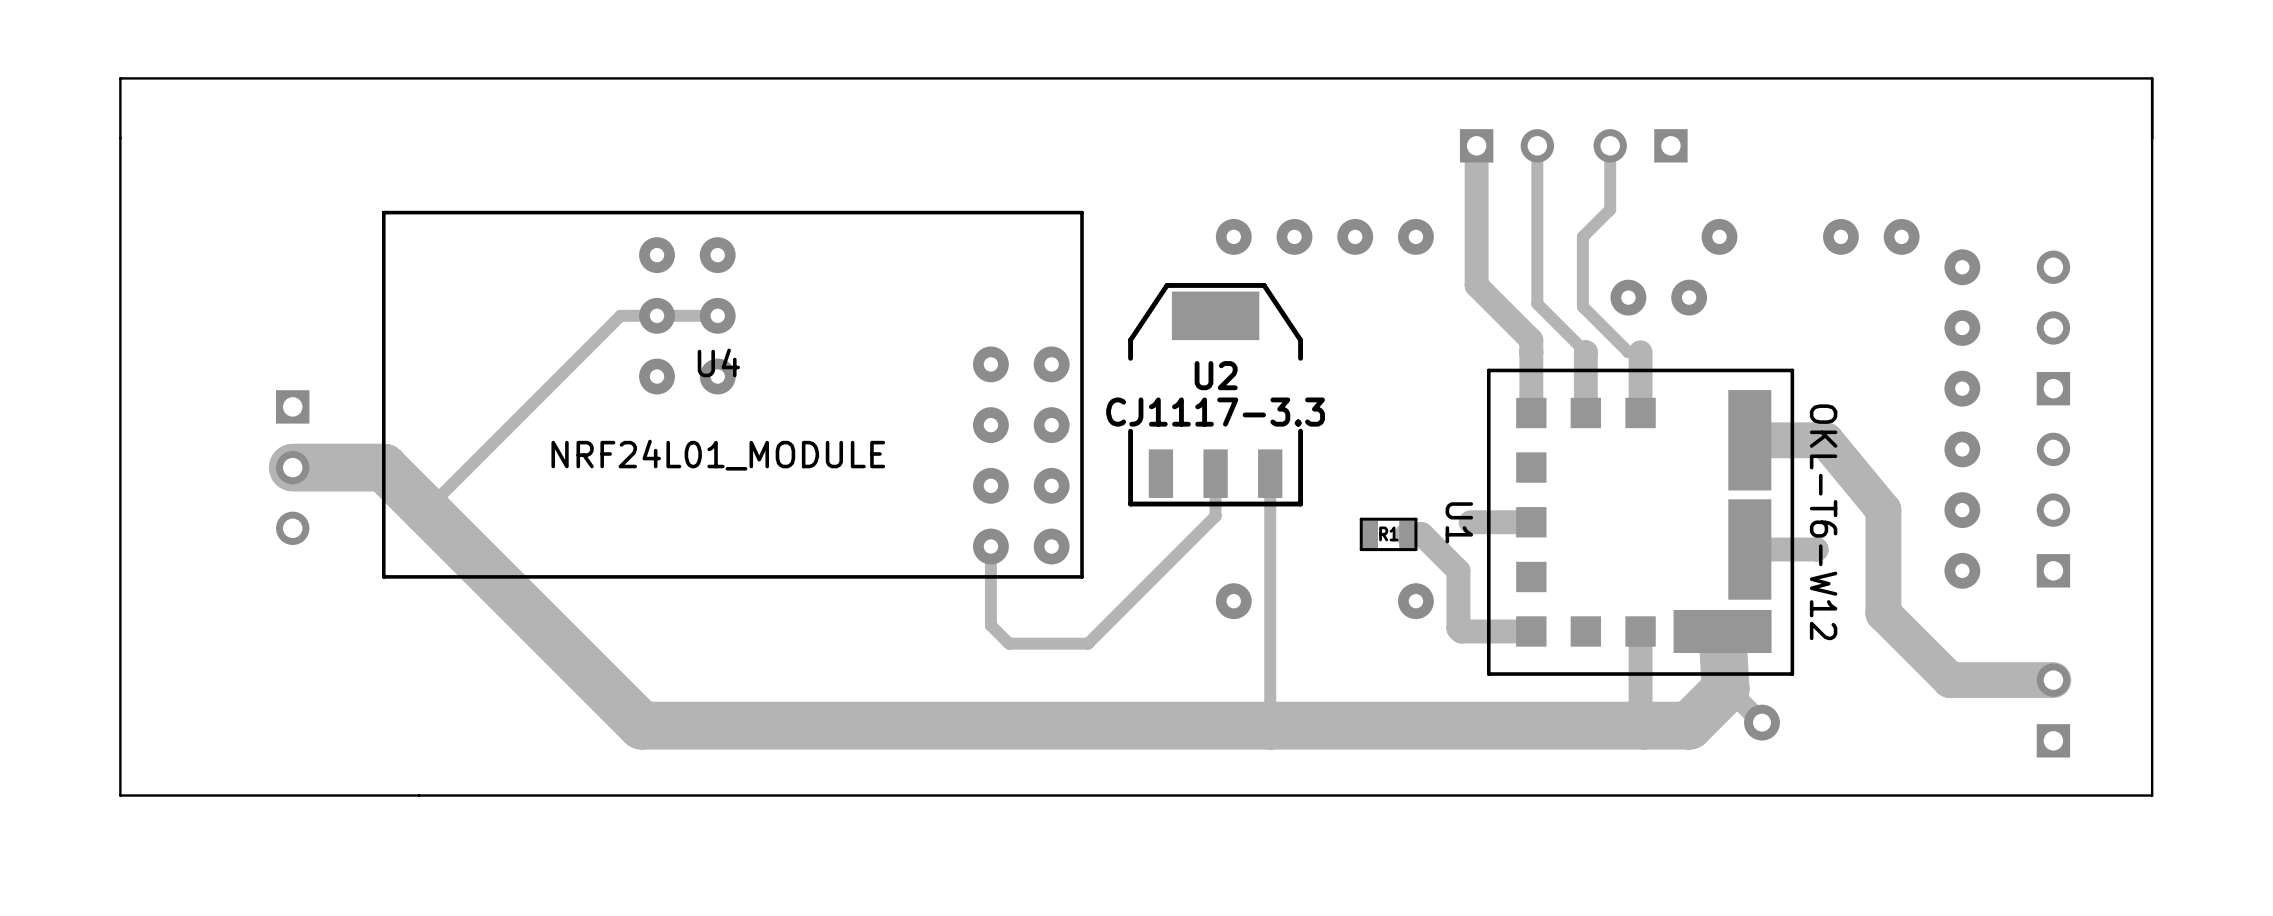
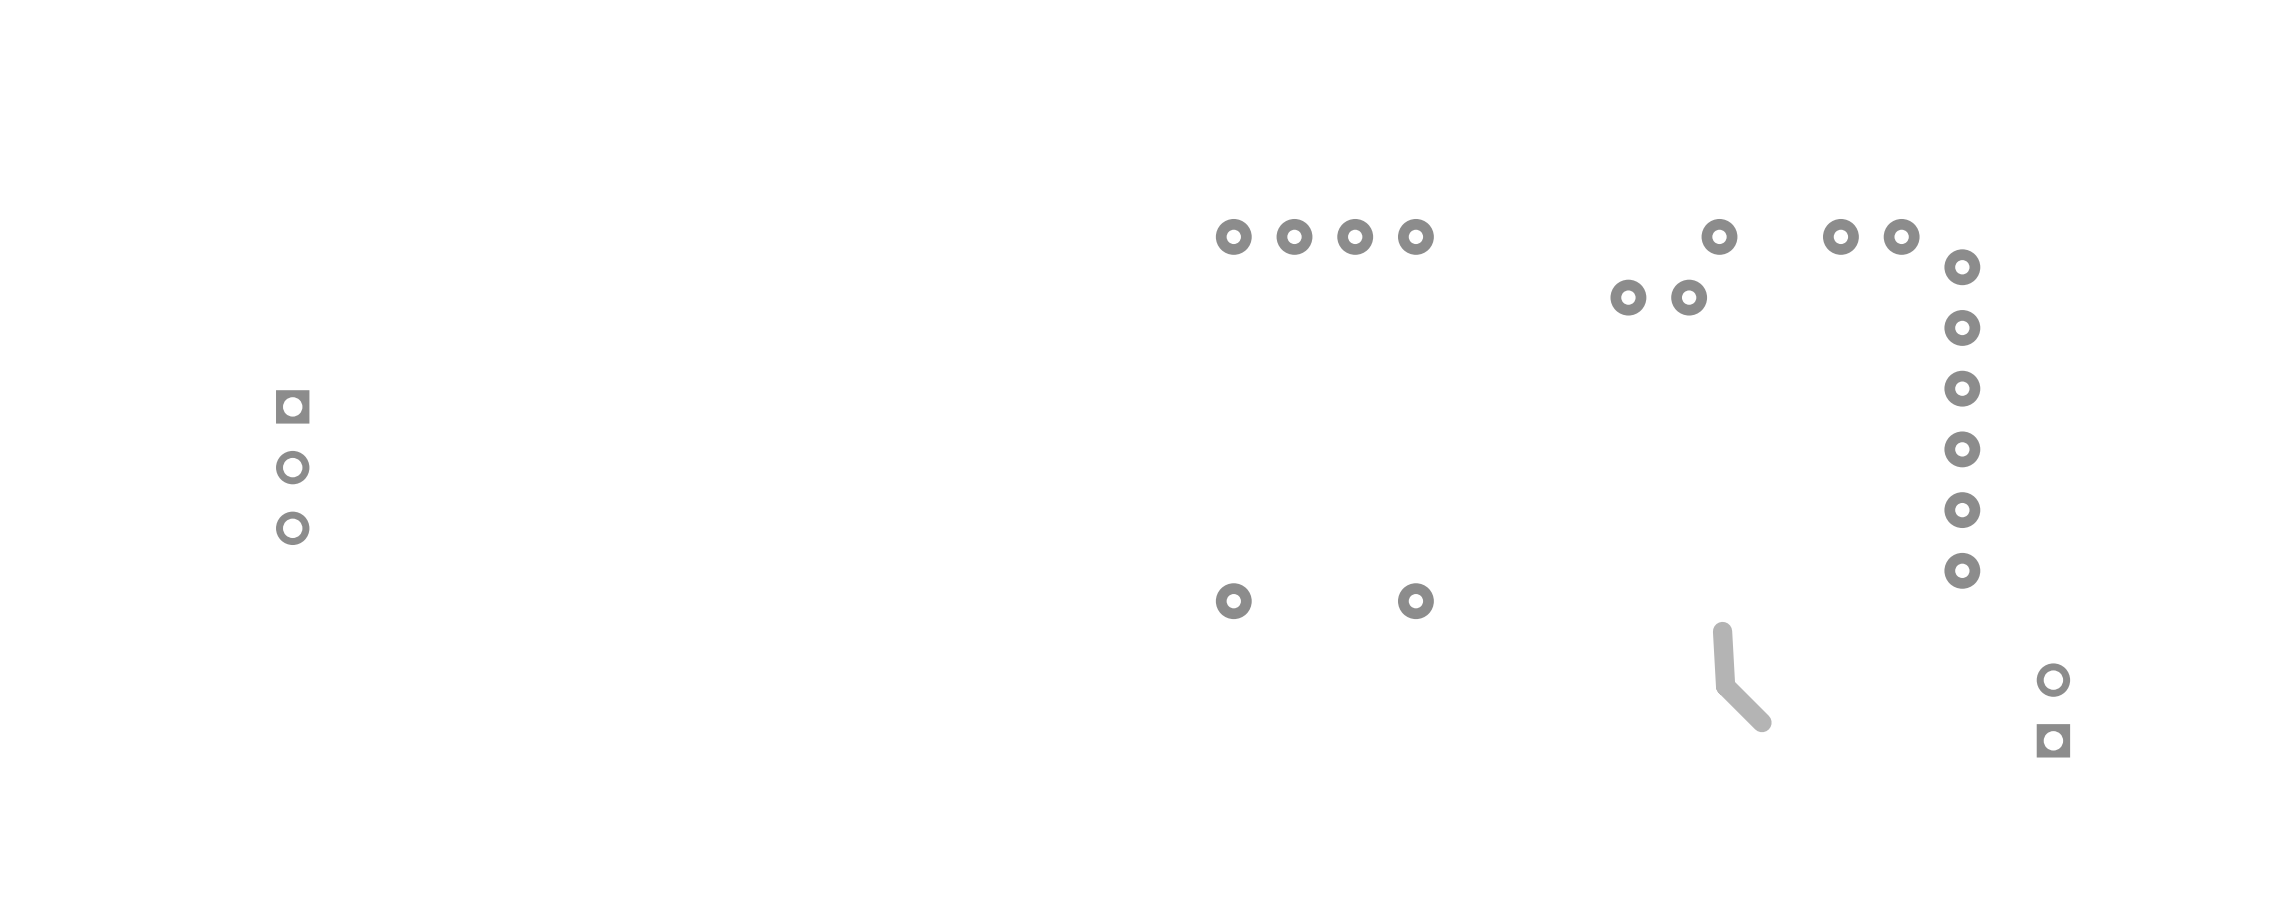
board edge: (2152, 78) (120, 78) (120, 795) (2152, 795) (2152, 78) -> none
track: (1476, 145) (1476, 285) (1531, 340) (1531, 413) -> none
part: (1507, 145) -> none
track: (1537, 145) (1537, 303) (1585, 352) (1585, 413) -> none
track: (1610, 145) (1610, 209) (1582, 236) (1582, 306) (1628, 352) (1640, 352) (1640, 413) -> none
part: (1640, 145) -> none
part: (687, 315) -> none
track: (717, 315) (620, 315) (426, 510) -> none
part: (2053, 327) -> none
U4: NRF24L01_MODULE (732, 394) -> none
U2: CJ1117-3.3 (1215, 394) -> none
track: (1749, 440) (1825, 440) (1883, 510) (1883, 613) (1950, 680) (2053, 680) -> none
track: (292, 467) (383, 467) (641, 725) (1689, 725) (1725, 689) (1722, 634) -> none
track: (1215, 473) (1215, 516) (1088, 643) (1009, 643) (990, 625) (990, 546) -> none
track: (1270, 473) (1270, 725) -> none
part: (2053, 510) -> none
track: (1531, 522) (1470, 522) -> none
U1: OKL-T6-W12 (1640, 522) -> none
R1: (1388, 534) -> none
track: (1406, 534) (1422, 534) (1458, 570) (1458, 628) (1461, 631) (1531, 631) -> none
track: (1816, 549) (1749, 549) -> none
track: (1640, 631) (1640, 722) (1643, 725) -> none
via: (1761, 722) -> none

